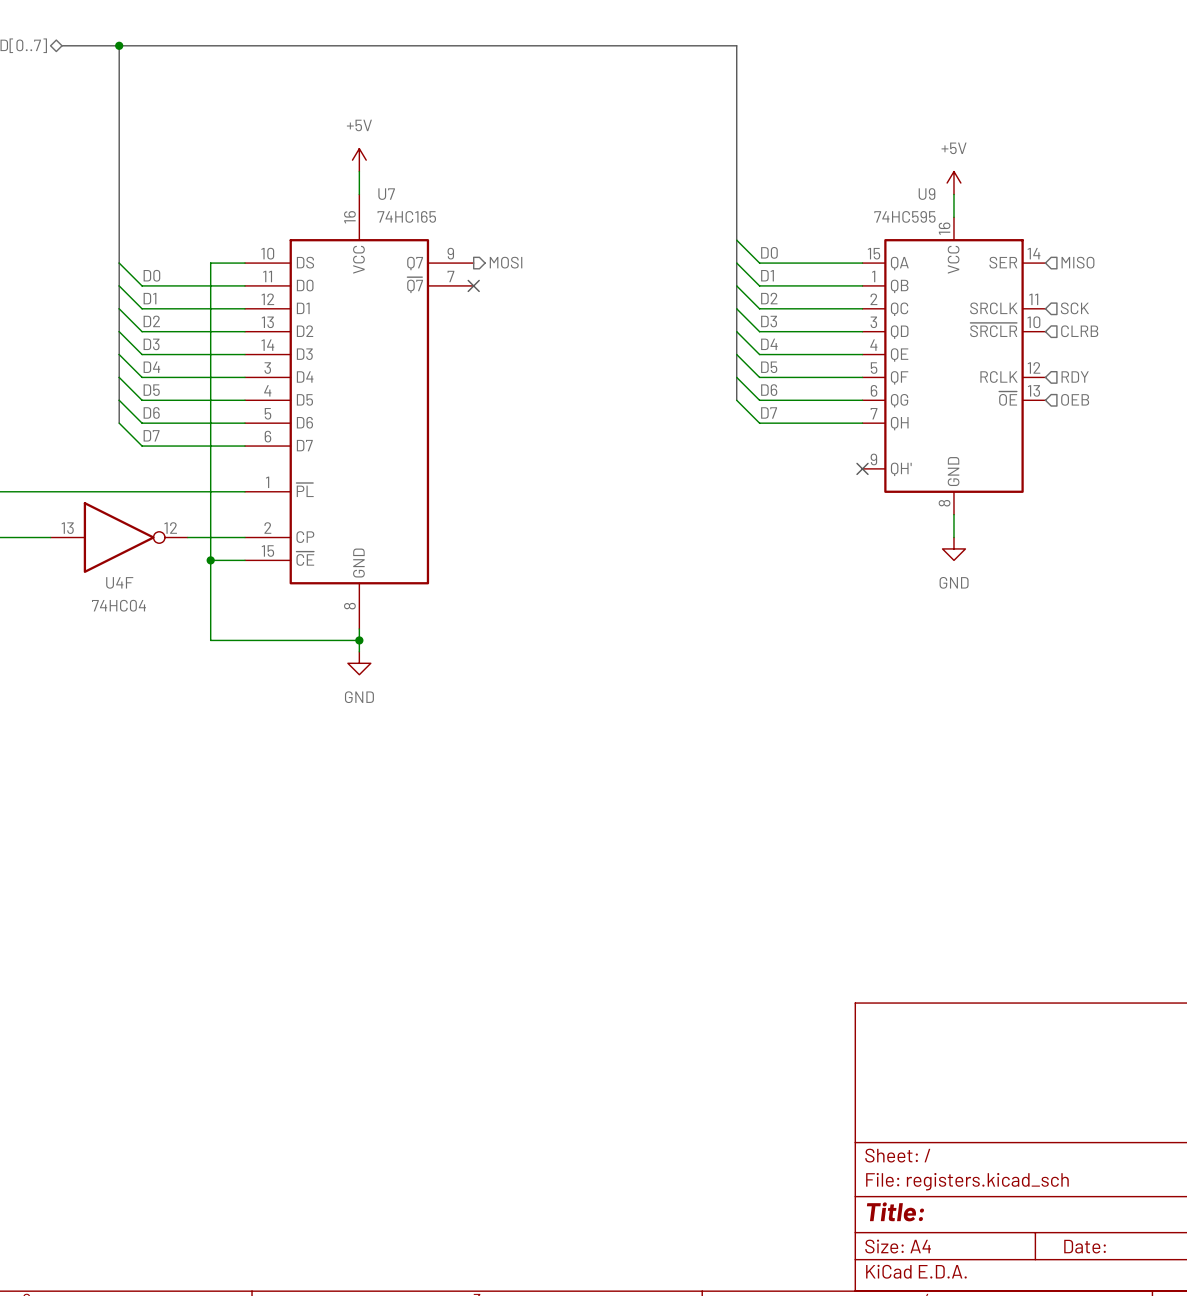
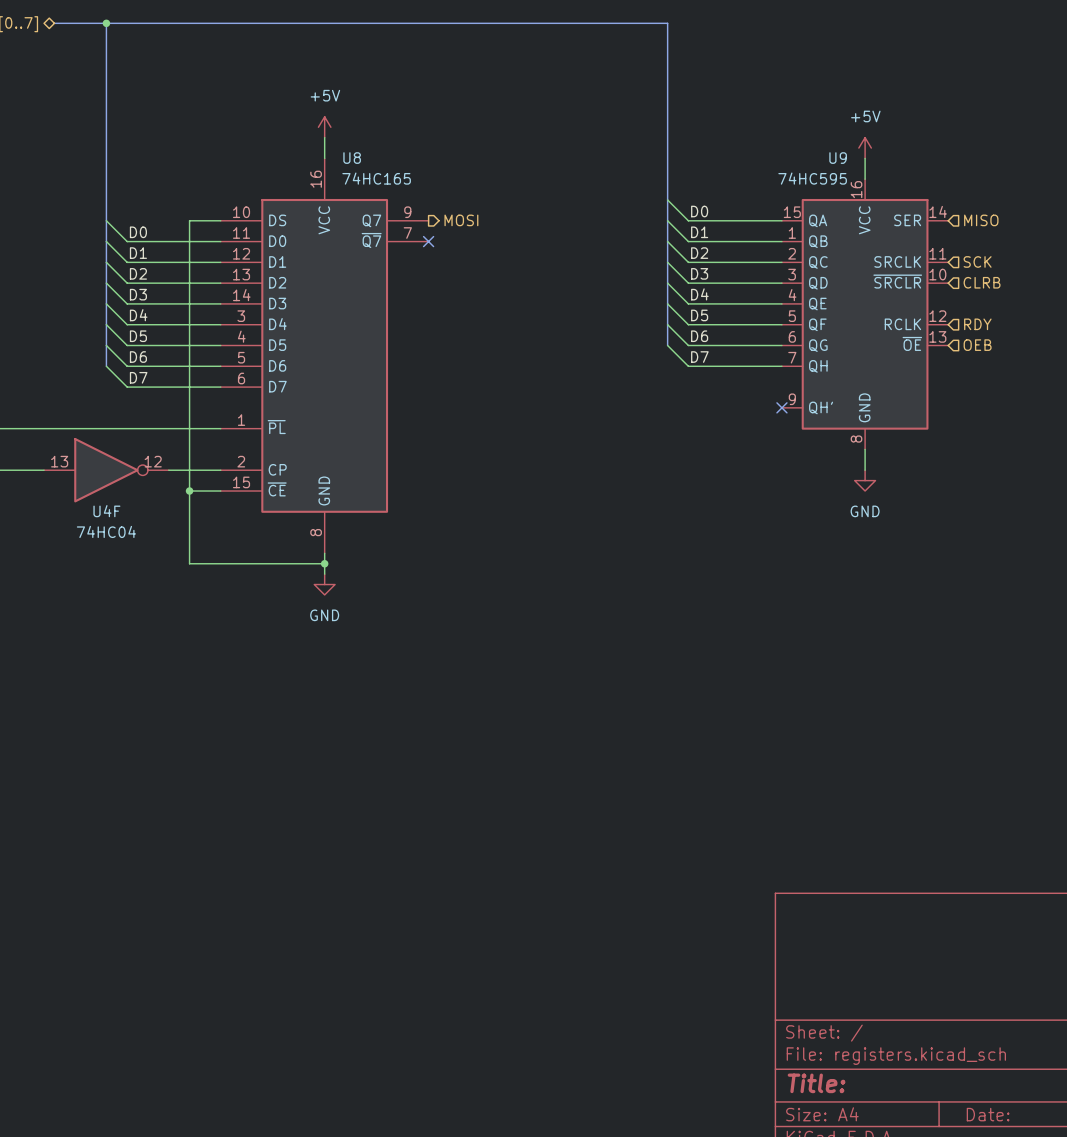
U7 name: U7 (386, 194) -> U8 (352, 158)

